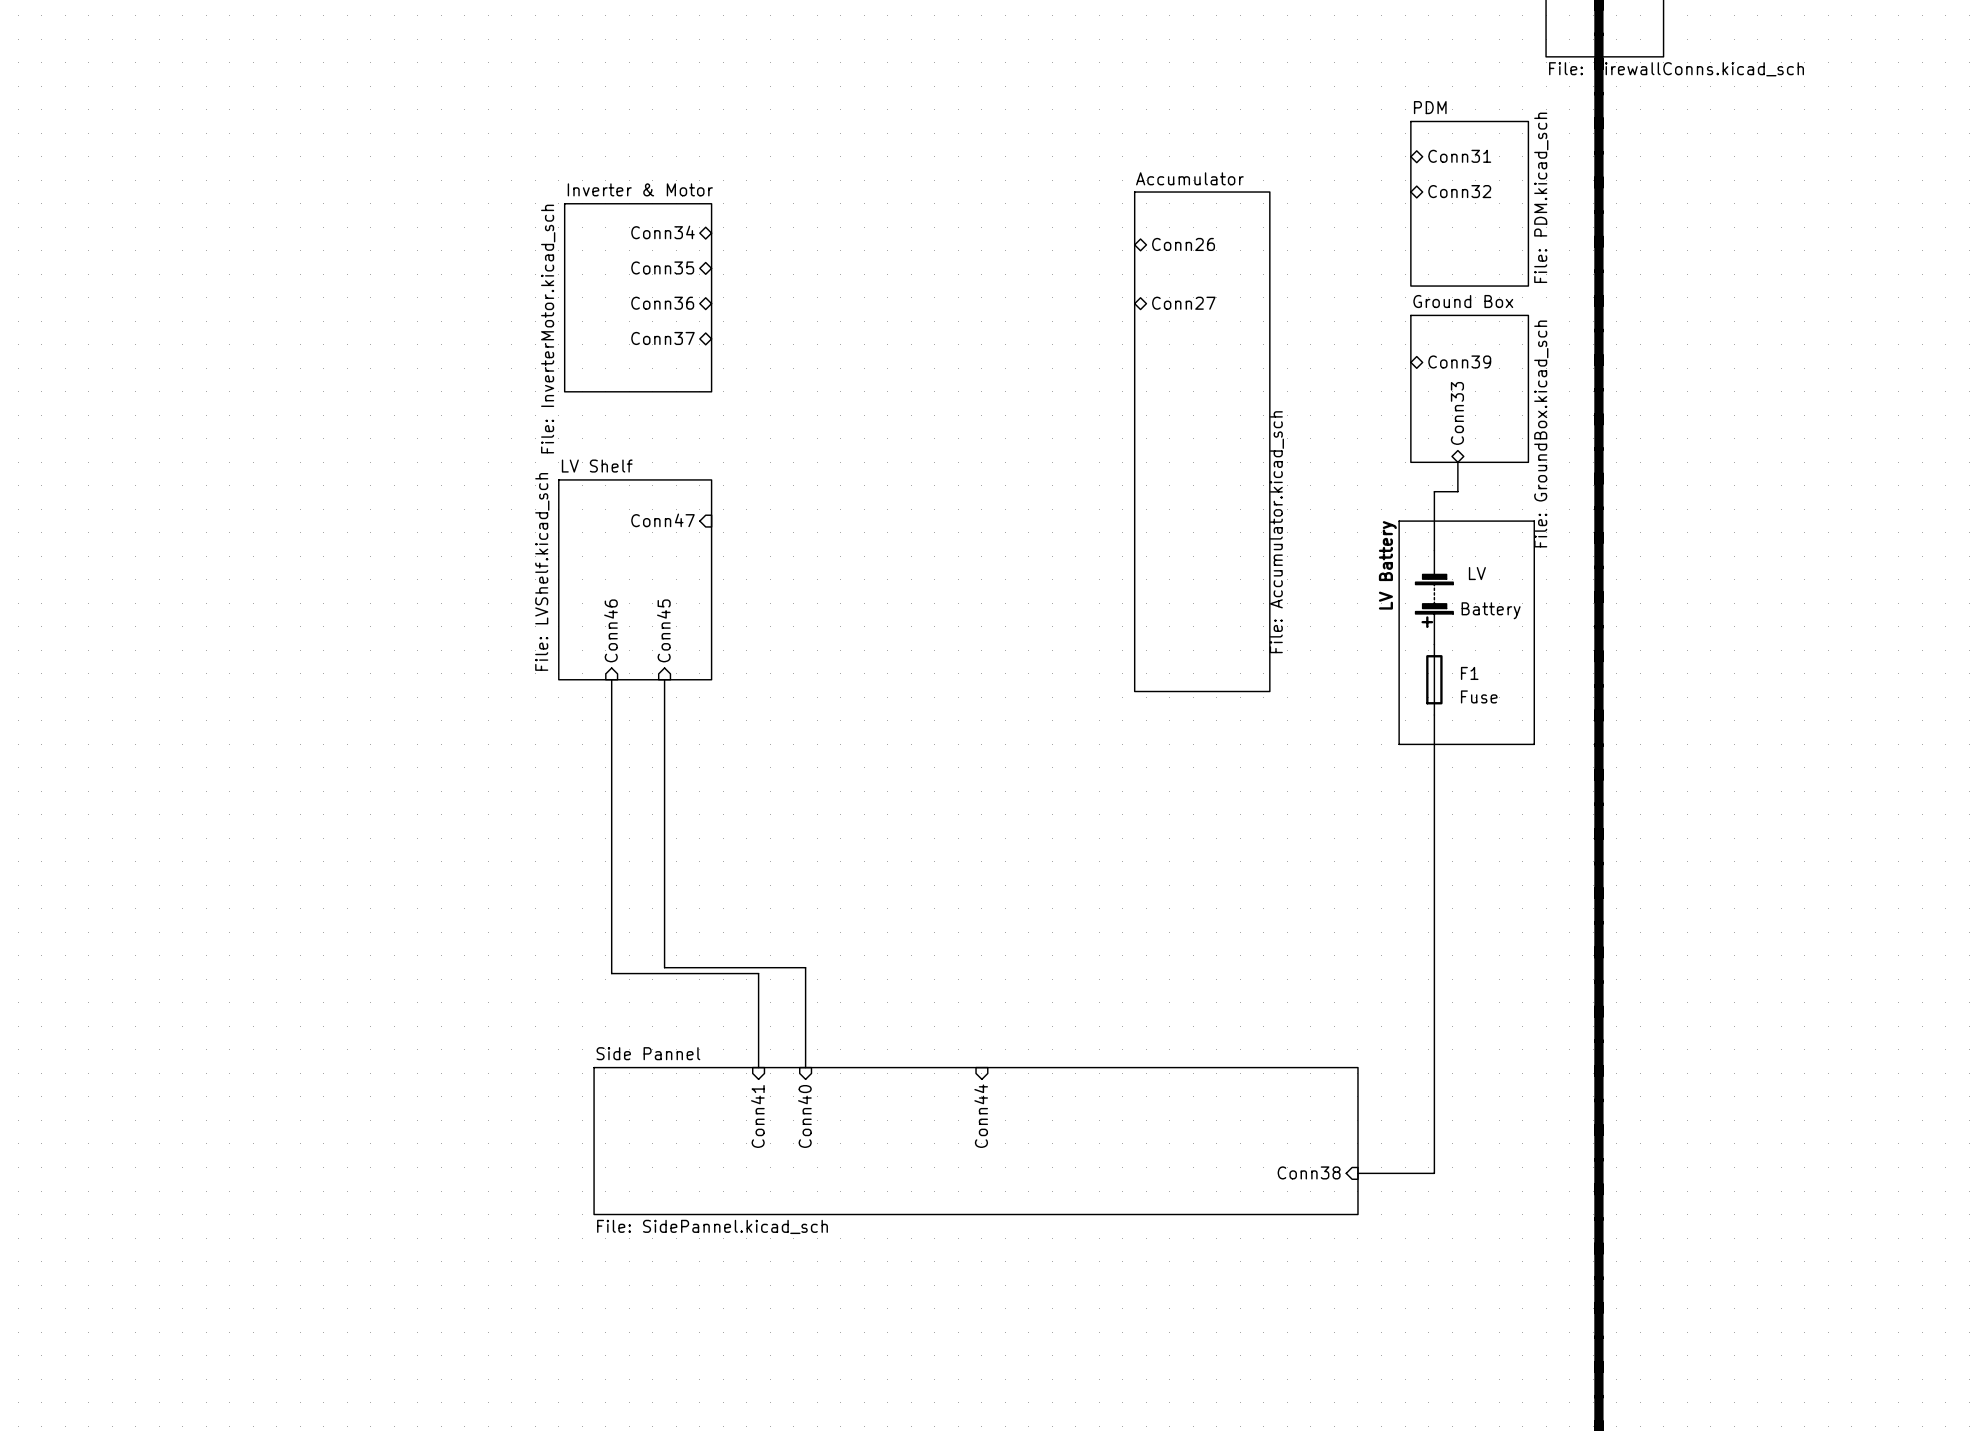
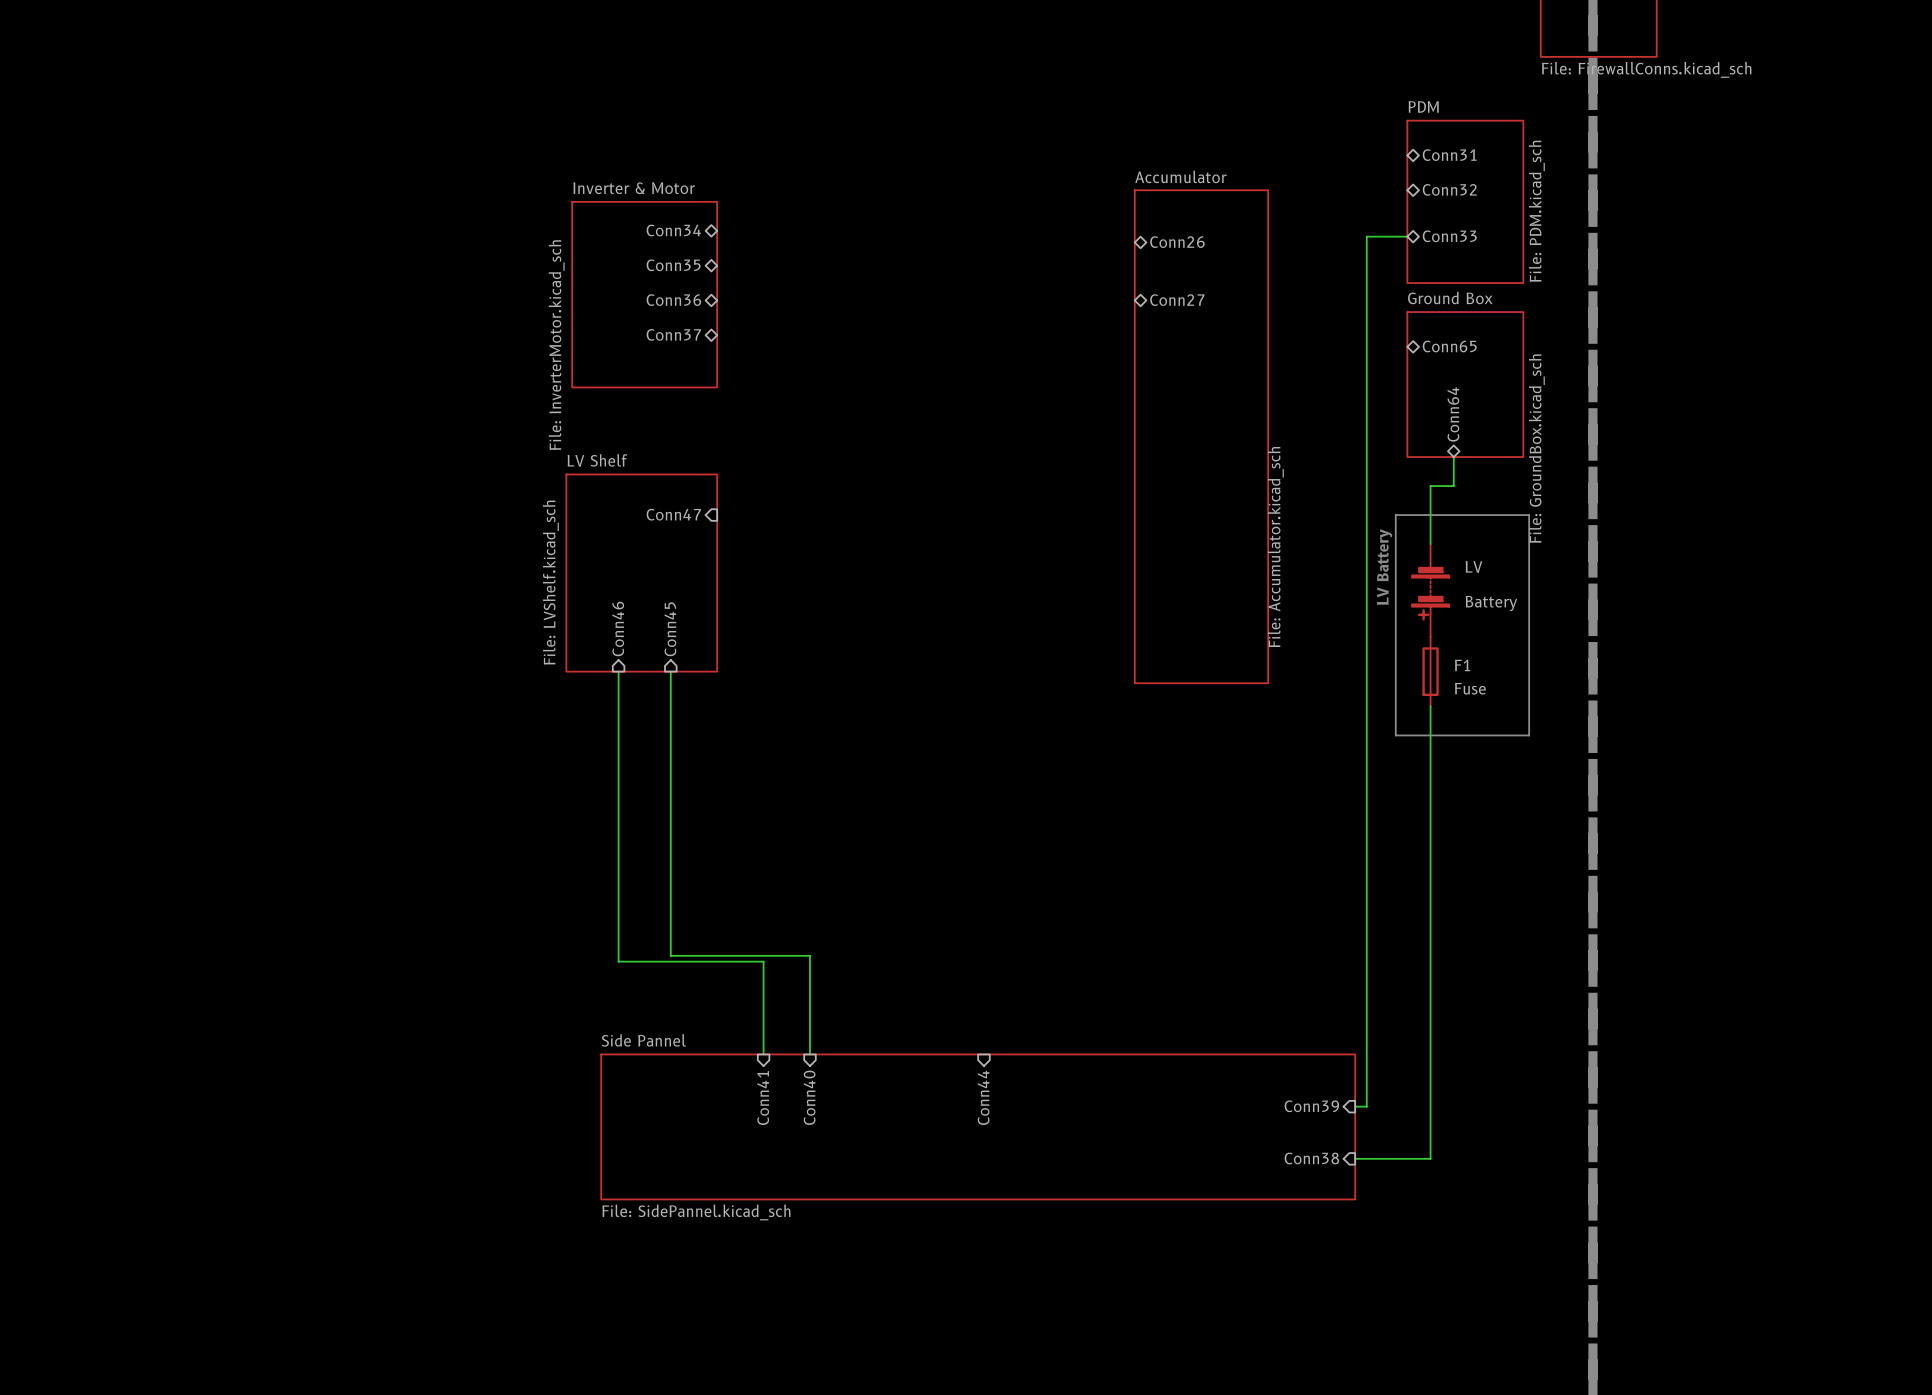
sheet pin: none -> Conn33 (1449, 236)
wire: none -> (1407, 236) (1366, 236) (1366, 1106) (1355, 1106)
sheet pin: Conn39 (1459, 361) -> Conn65 (1449, 346)
sheet pin: Conn33 (1457, 413) -> Conn64 (1453, 414)
sheet pin: none -> Conn39 (1311, 1106)

